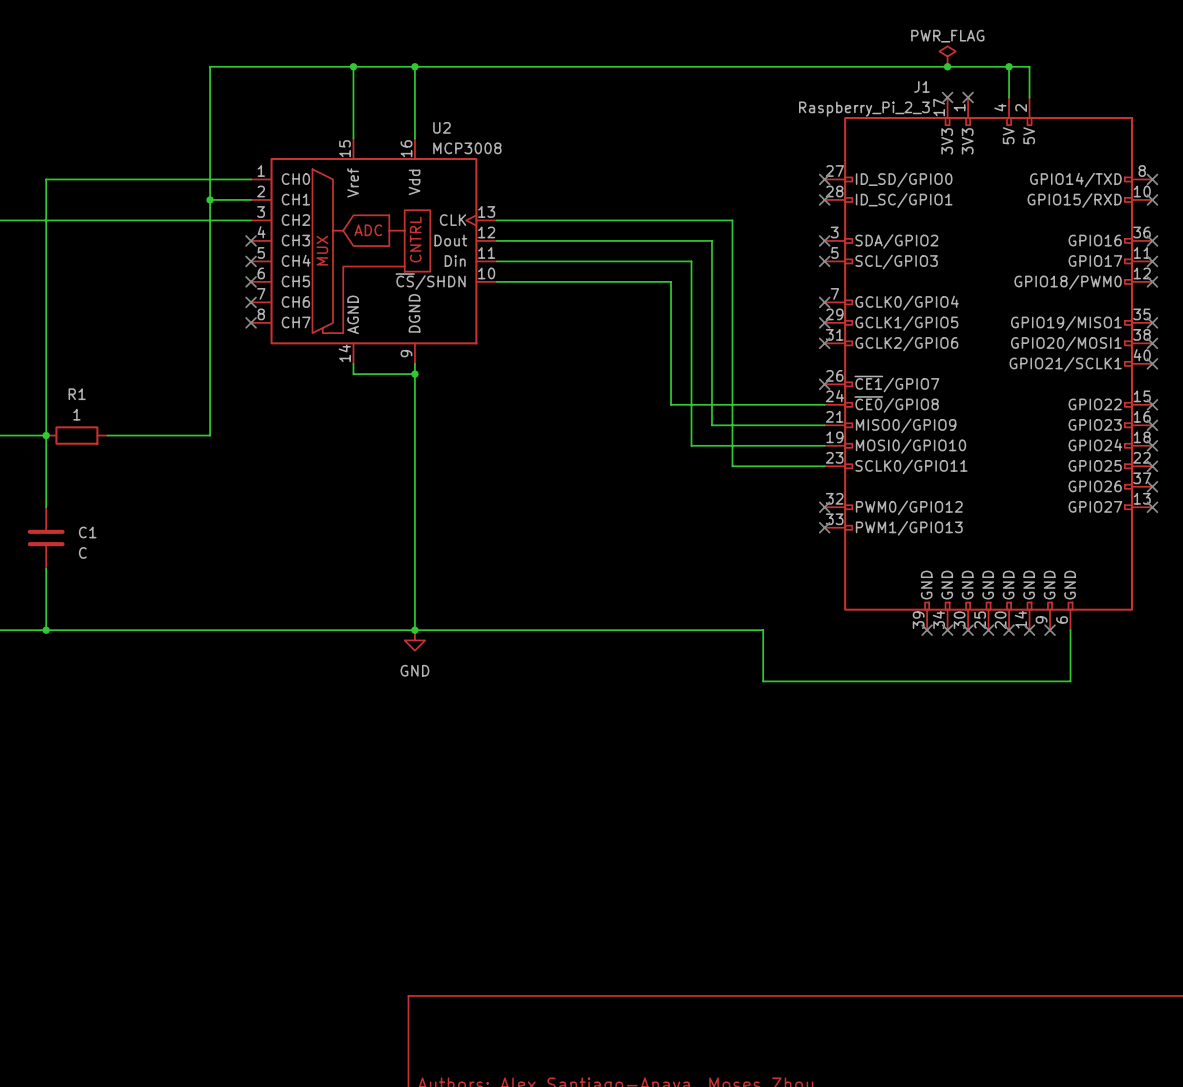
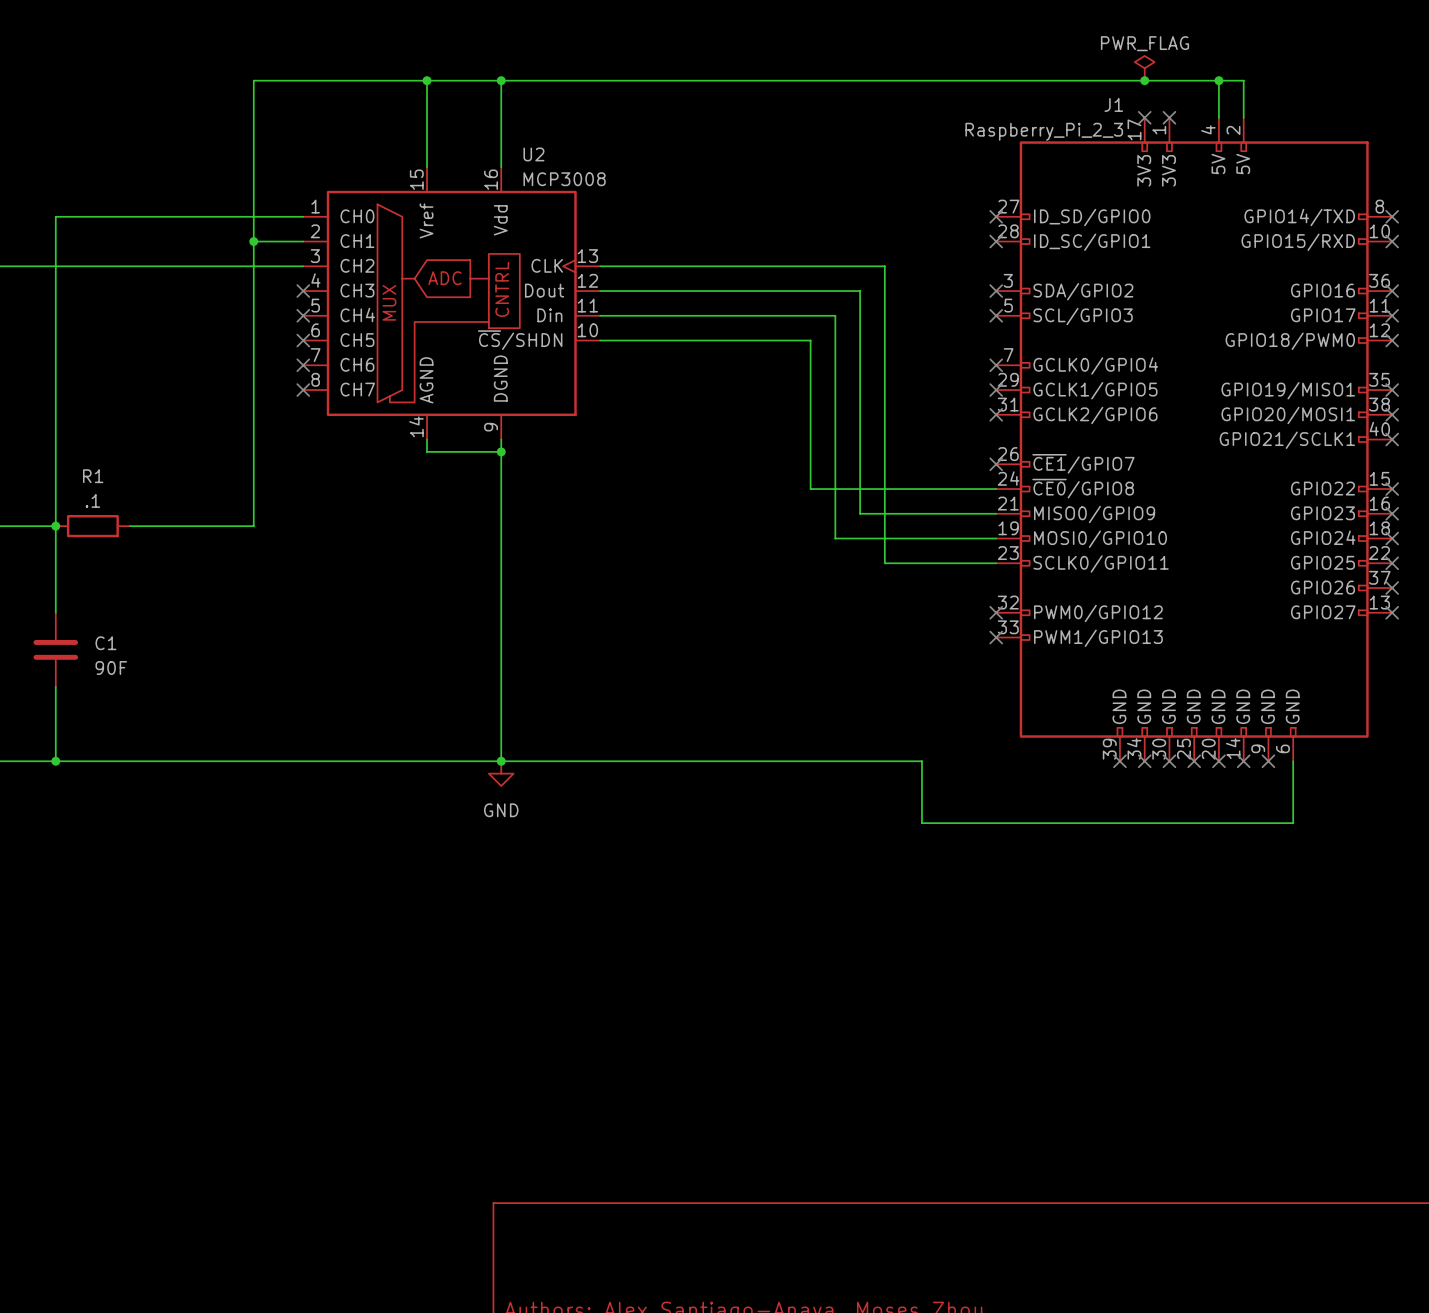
R1 value: 1 (76, 414) -> .1 (92, 500)
C1 value: C (82, 552) -> 90F (111, 667)

